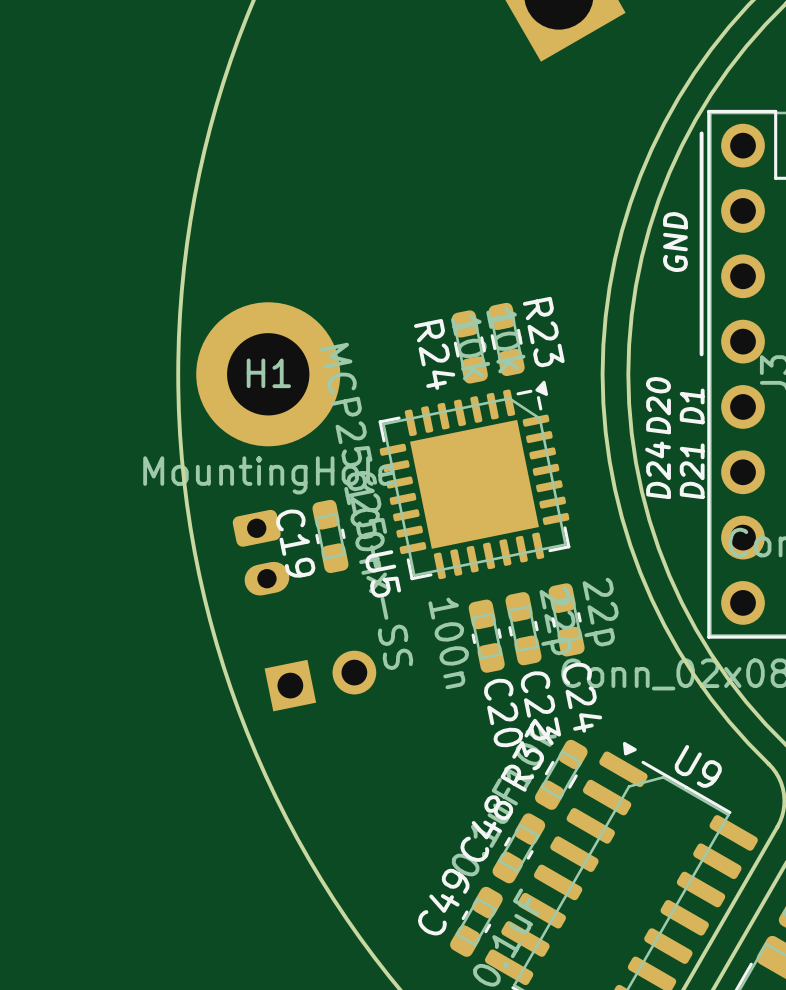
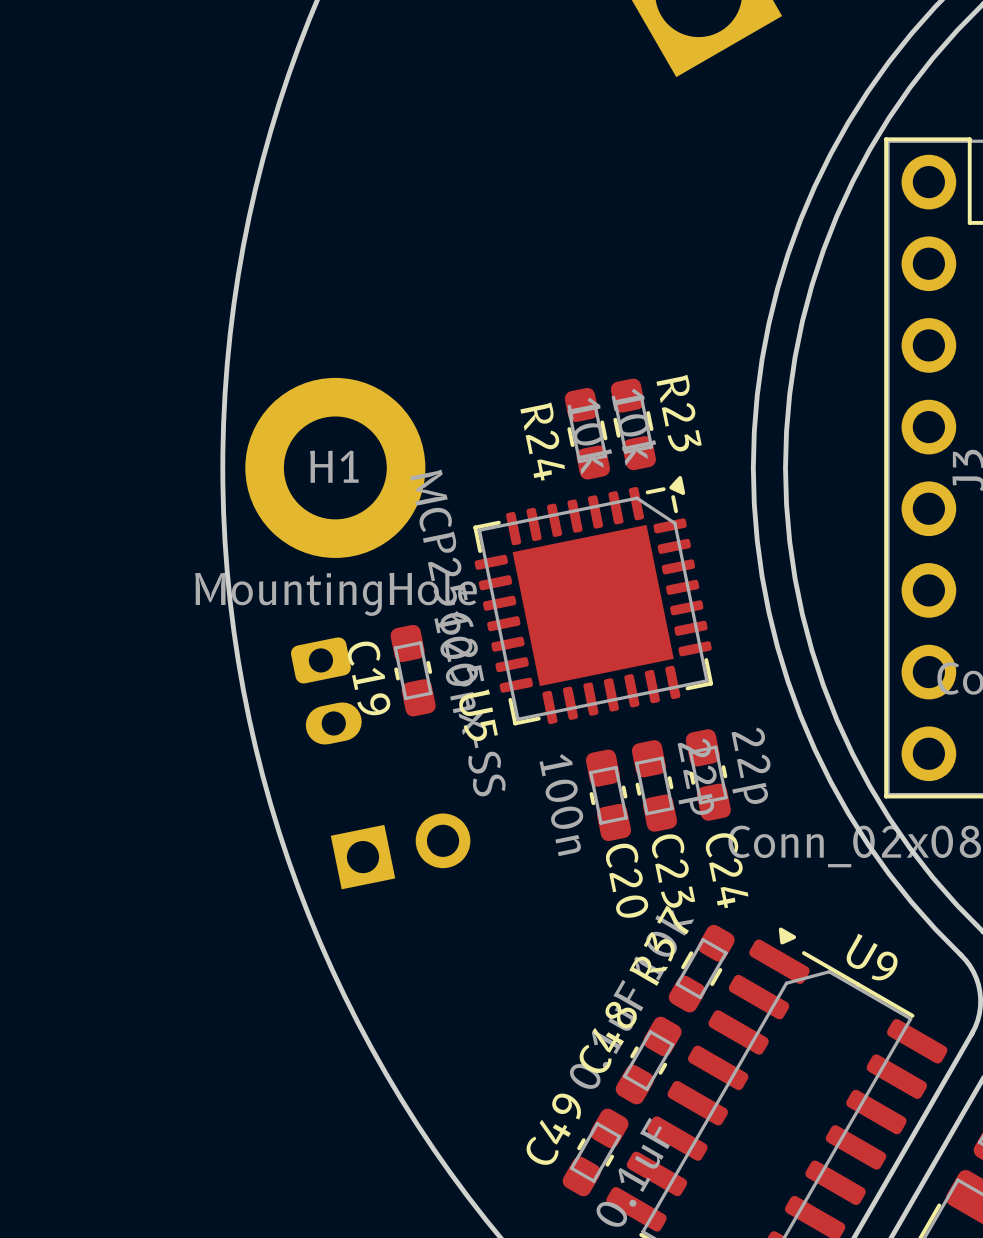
line: (701, 133) (701, 354) -> none
text: GND (675, 242) -> none
text: D20 (658, 405) -> none
text: D1 (692, 406) -> none
text: D24 (658, 470) -> none
text: D21 (692, 471) -> none

